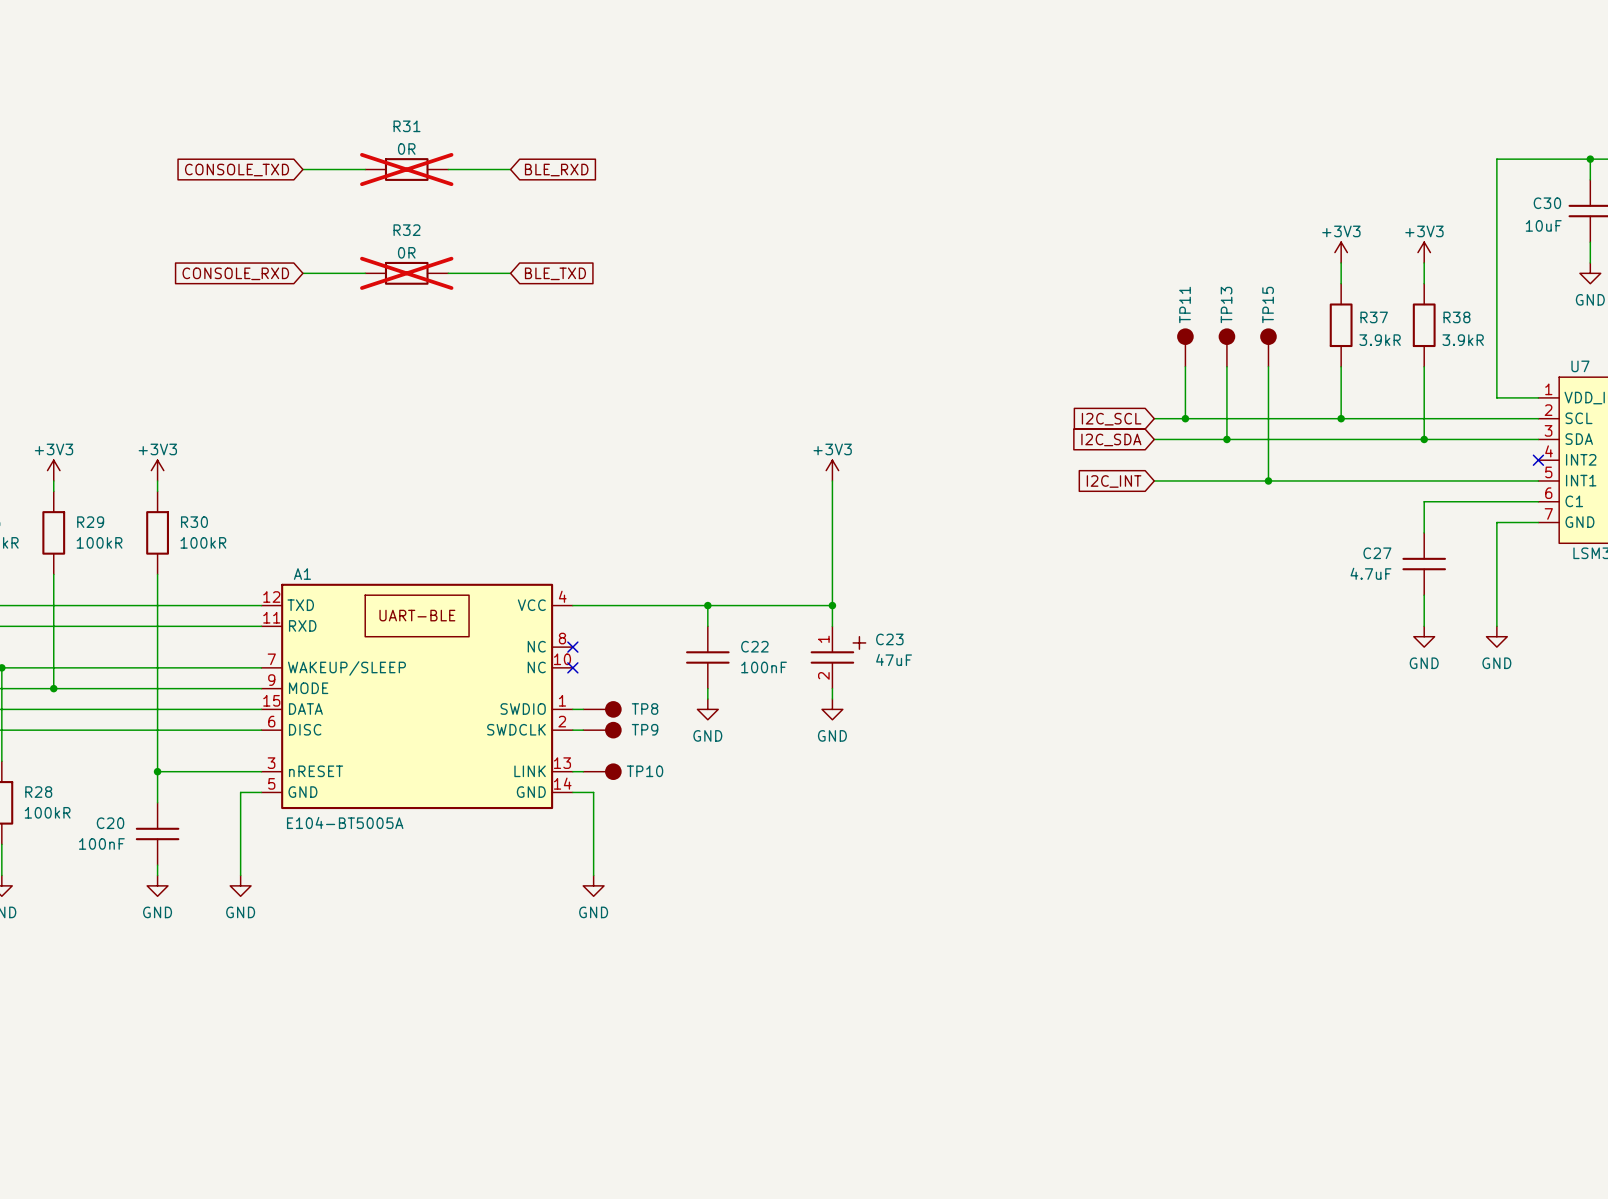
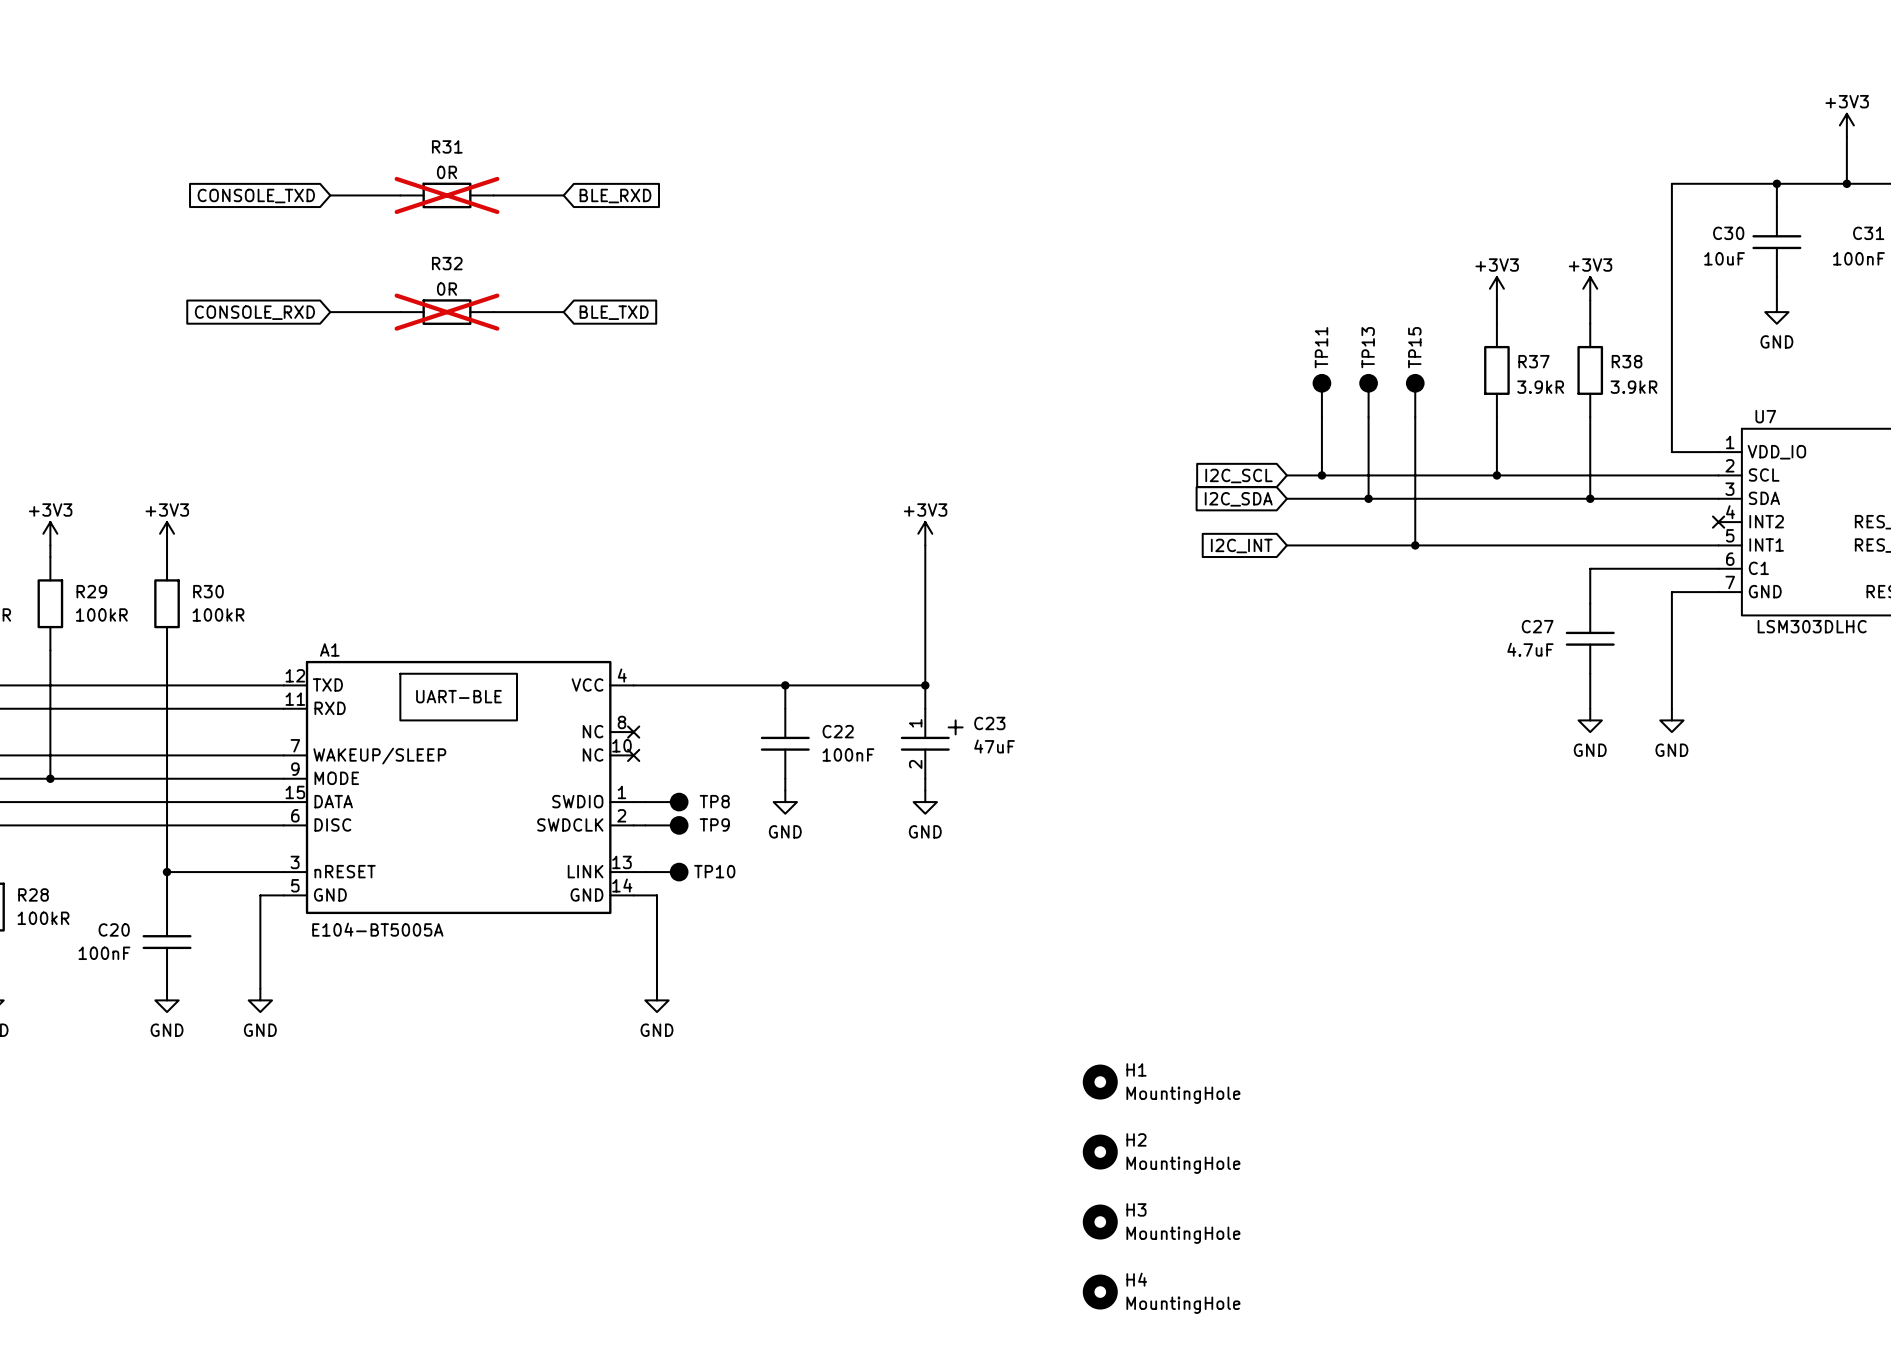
H1: none -> MountingHole (1100, 1082)
H2: none -> MountingHole (1100, 1152)
H3: none -> MountingHole (1100, 1222)
H4: none -> MountingHole (1100, 1292)

